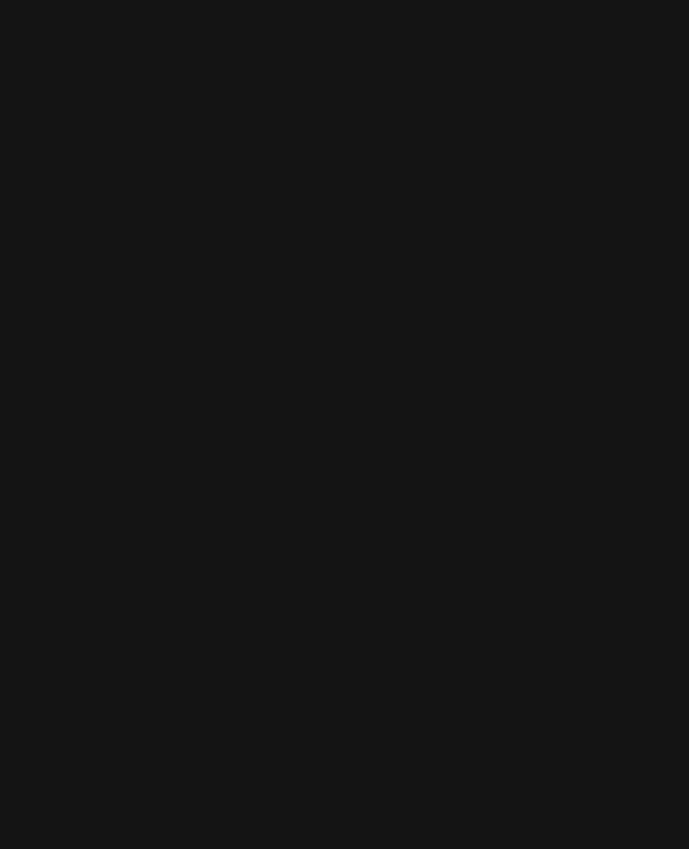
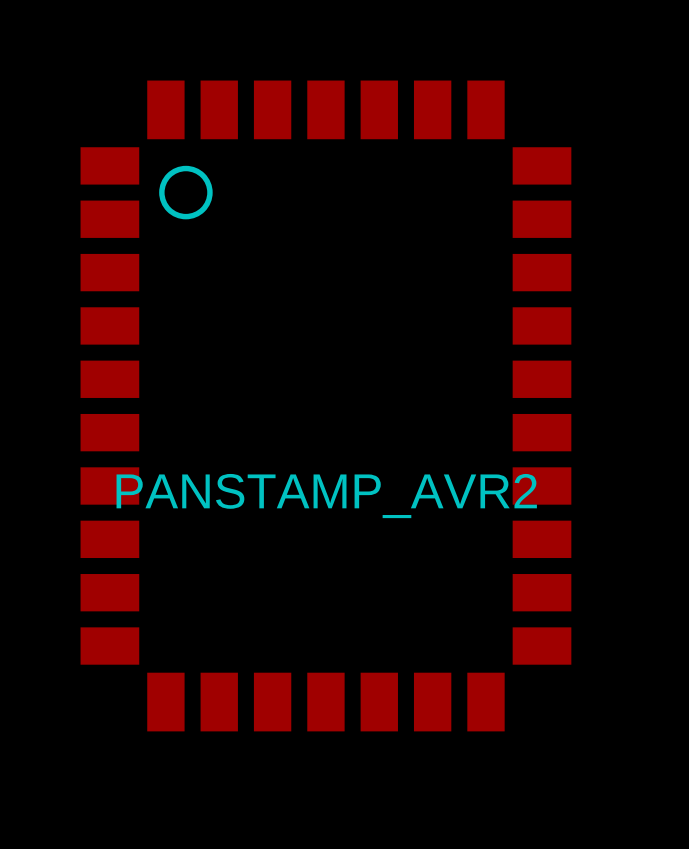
part: none -> PANSTAMP_AVR2 (325, 405)

